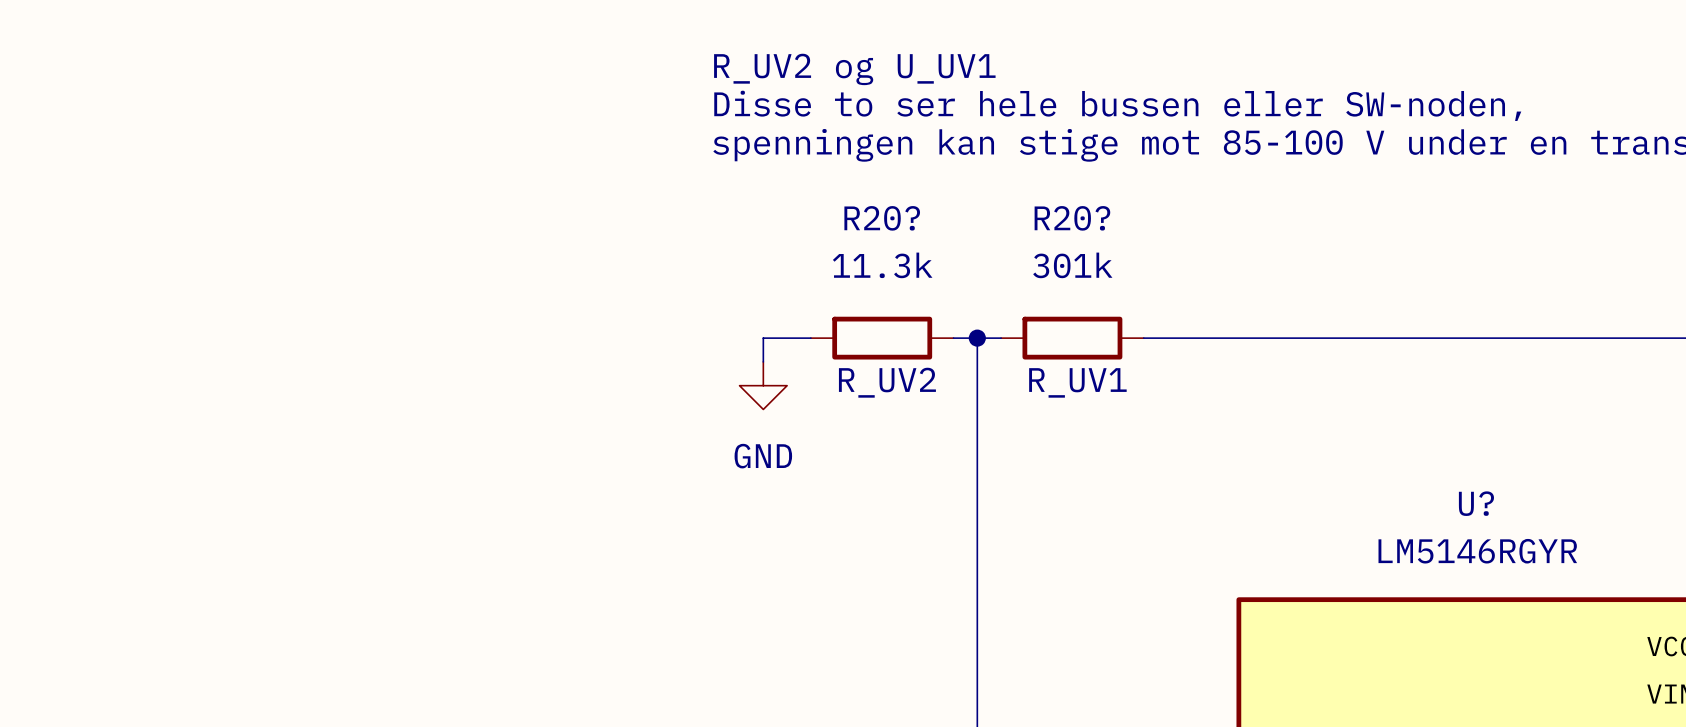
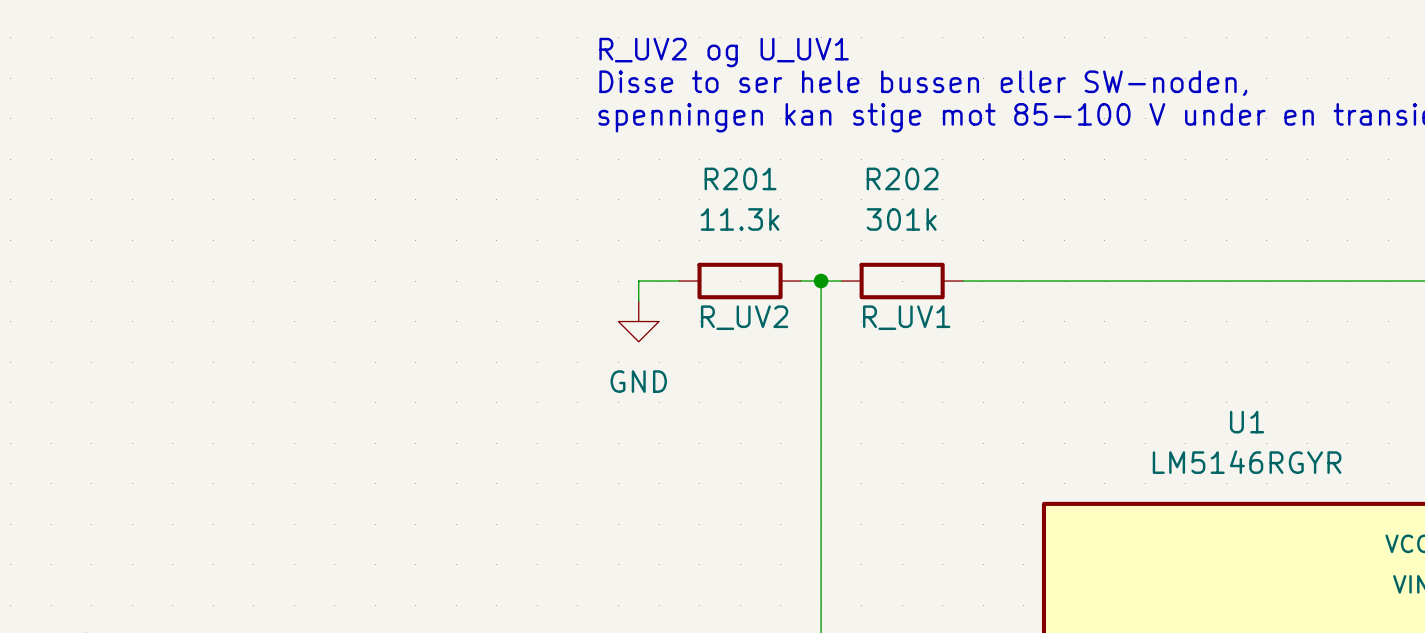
R20? name: R20? (882, 218) -> R201 (740, 178)
R20? name: R20? (1072, 218) -> R202 (902, 178)
U? name: U? (1476, 503) -> U1 (1247, 422)

